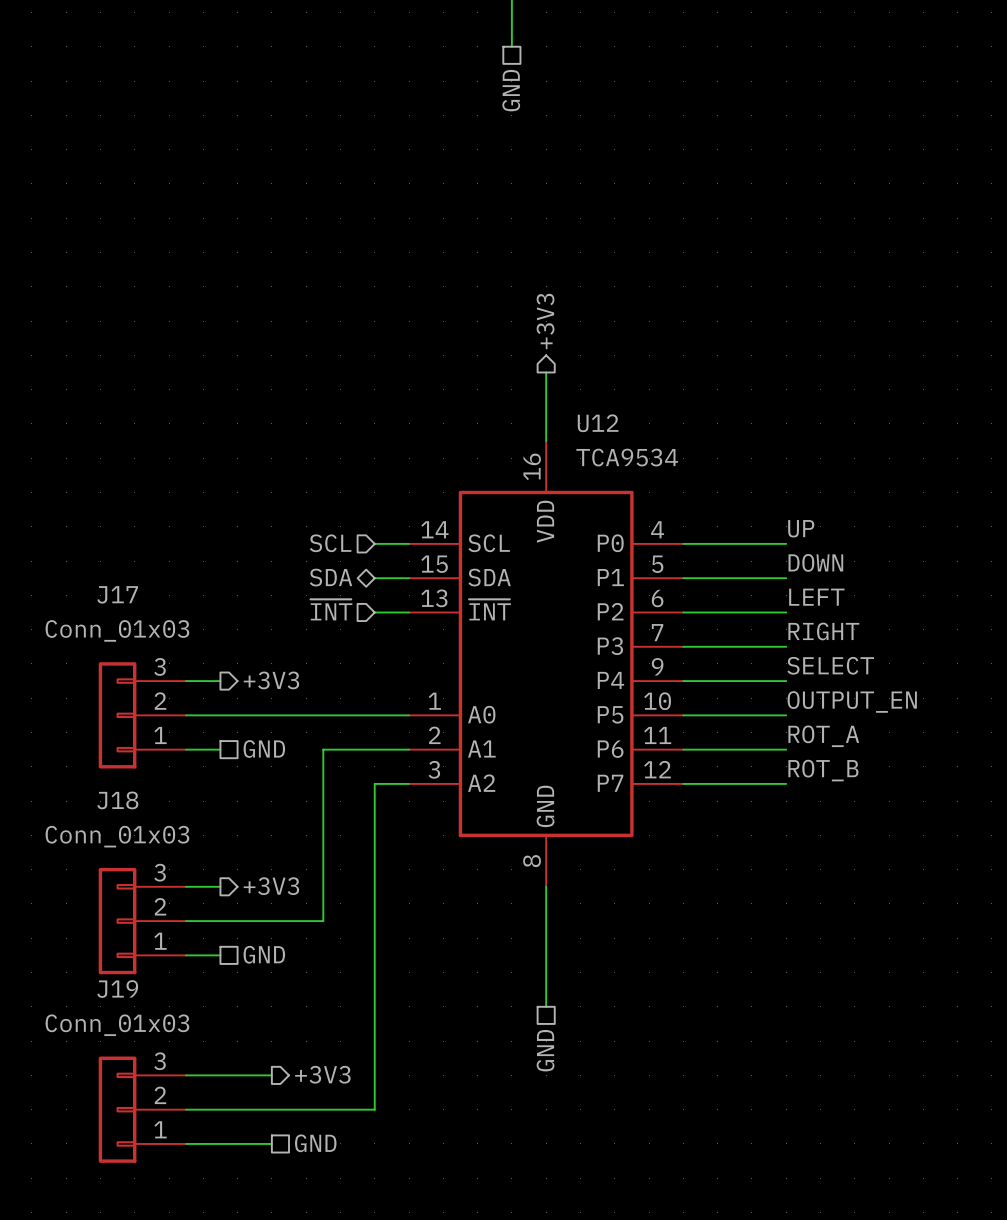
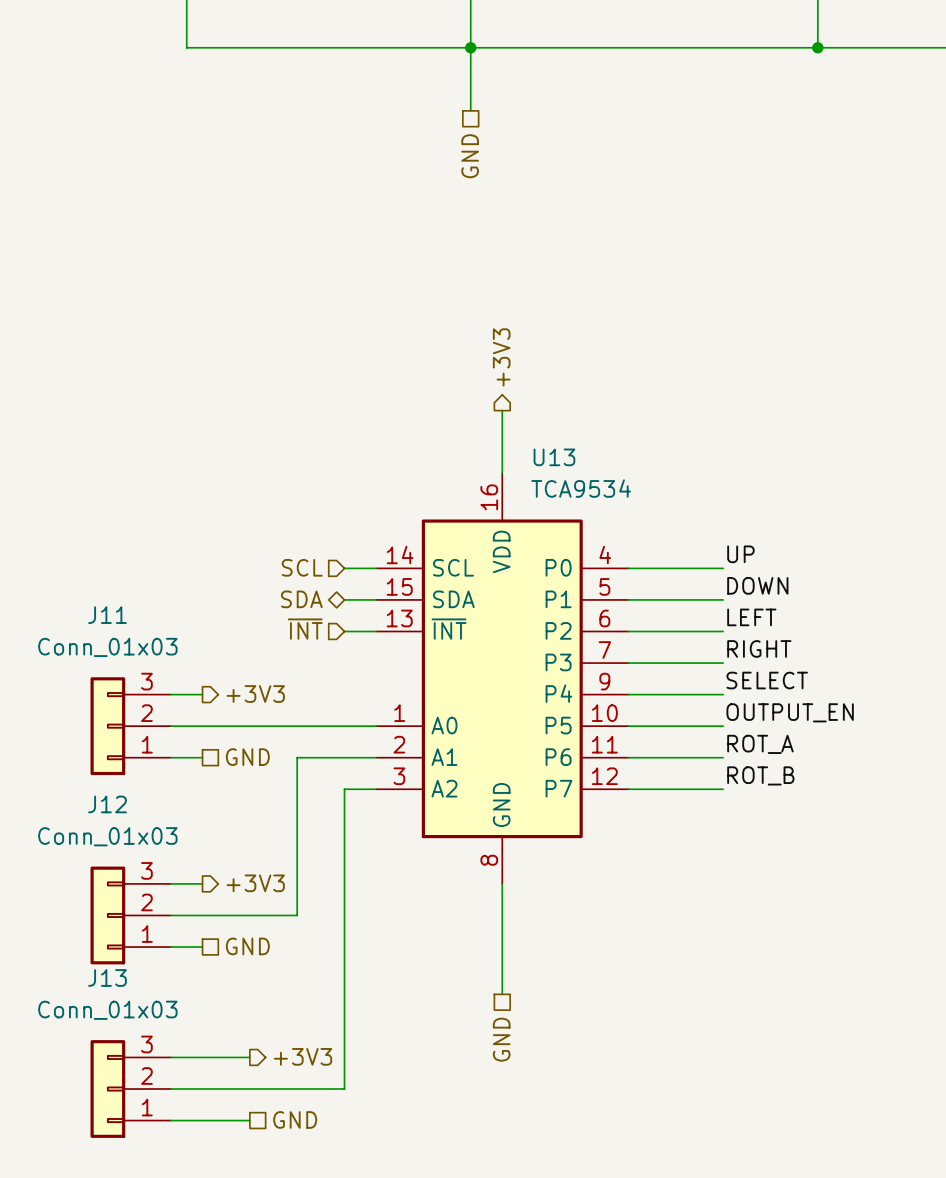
U12 name: U12 (598, 423) -> U13 (554, 457)
J17 name: J17 (117, 594) -> J11 (107, 615)
J18 name: J18 (117, 800) -> J12 (107, 804)
J19 name: J19 (117, 989) -> J13 (107, 977)

